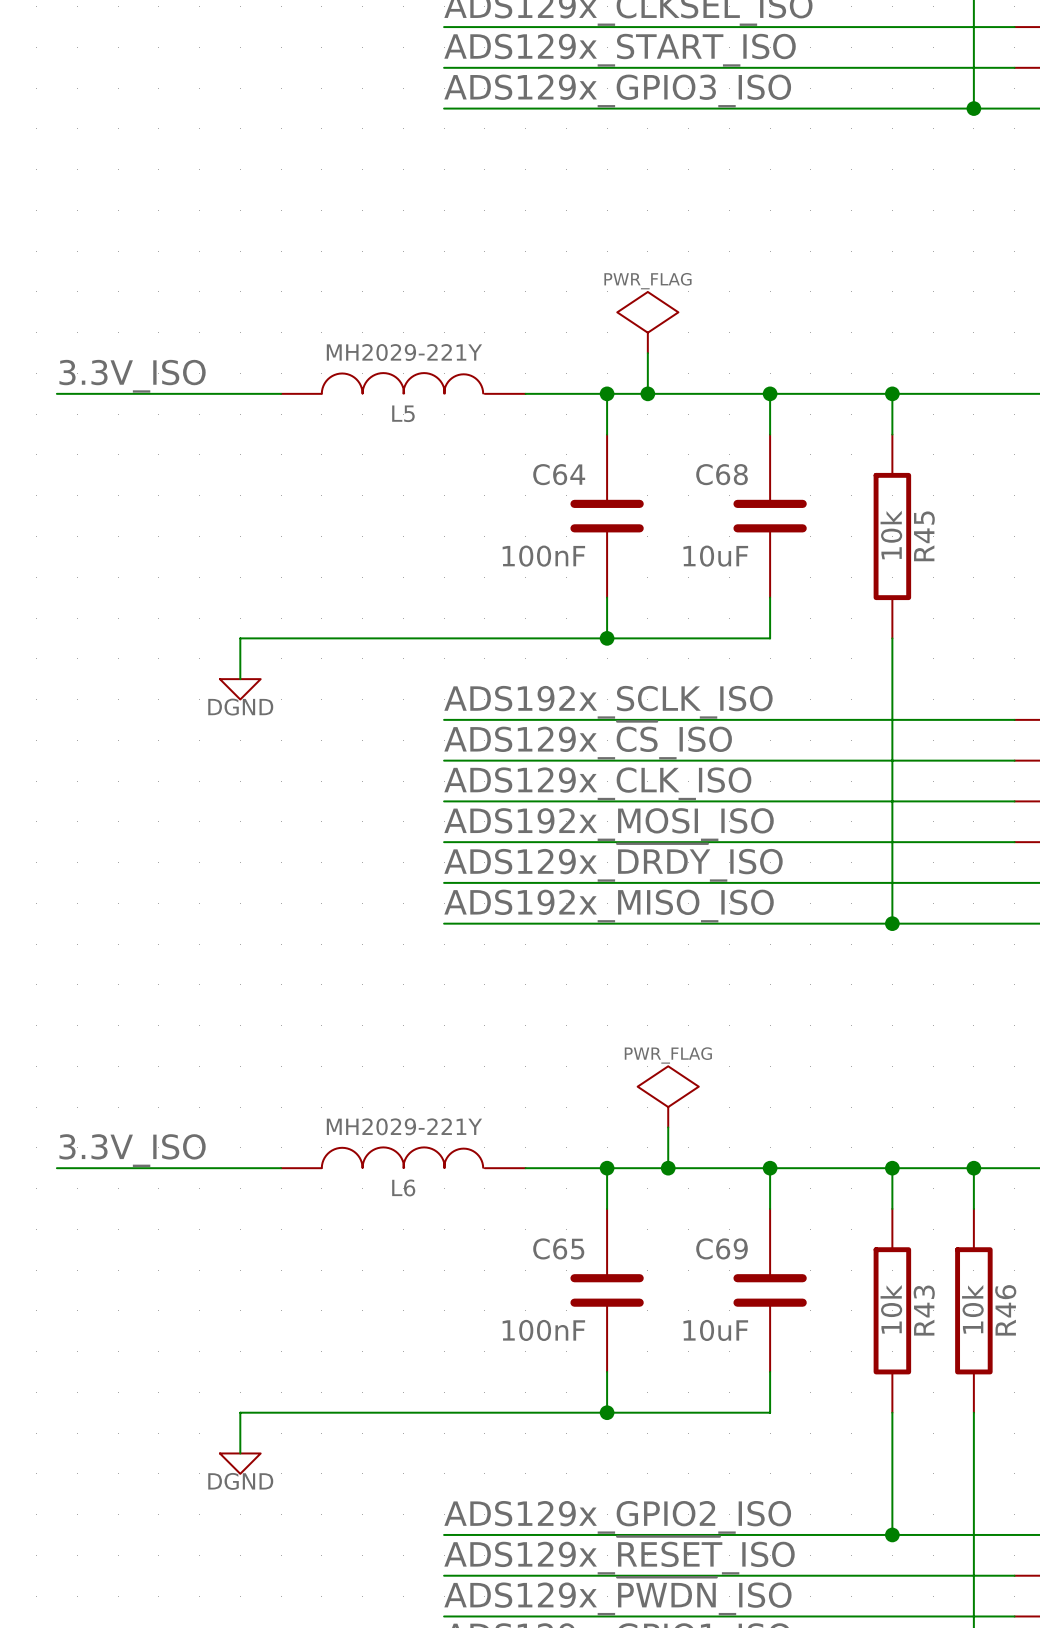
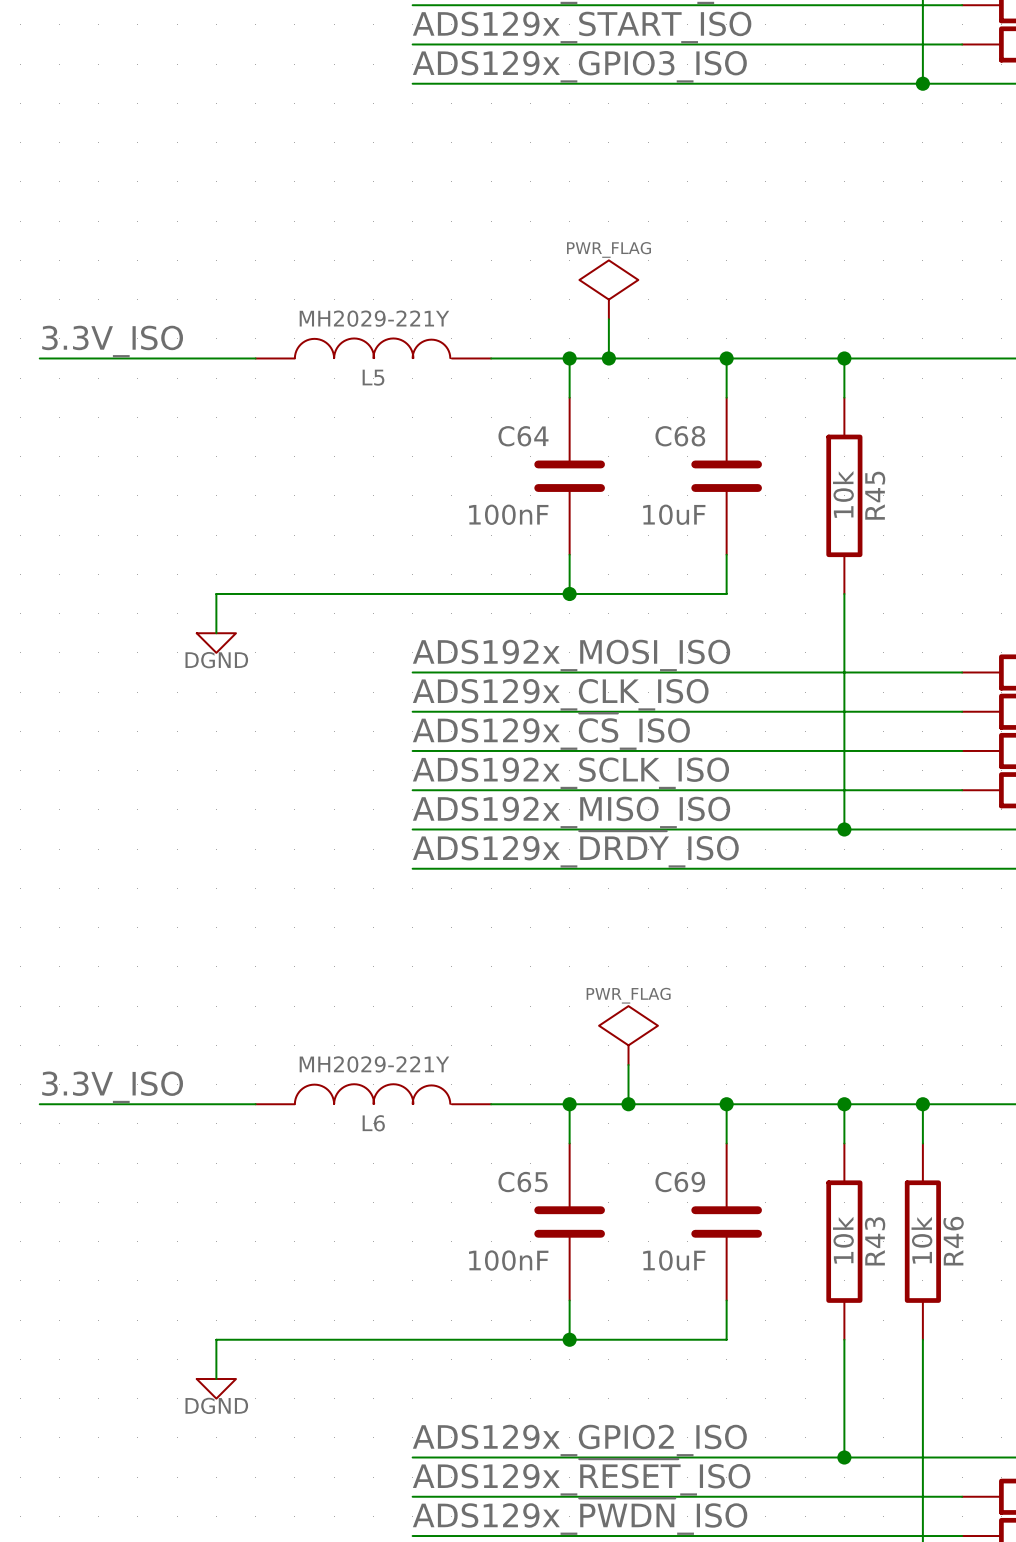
label: ADS192x_SCLK_ISO (608, 702) -> ADS192x_MOSI_ISO (571, 655)
label: ADS129x_~{CS}_ISO (588, 740) -> ADS129x_CLK_ISO (560, 694)
label: ADS129x_CLK_ISO (597, 783) -> ADS129x_~{CS}_ISO (551, 731)
label: ADS192x_MOSI_ISO (609, 824) -> ADS192x_SCLK_ISO (570, 773)
label: ADS129x_~{DRDY}_ISO (613, 862) -> ADS192x_MISO_ISO (571, 812)
wire: (892, 882) (892, 923) -> none
label: ADS192x_MISO_ISO (609, 906) -> ADS129x_~{DRDY}_ISO (575, 849)
junction position: (892, 923) -> (844, 829)

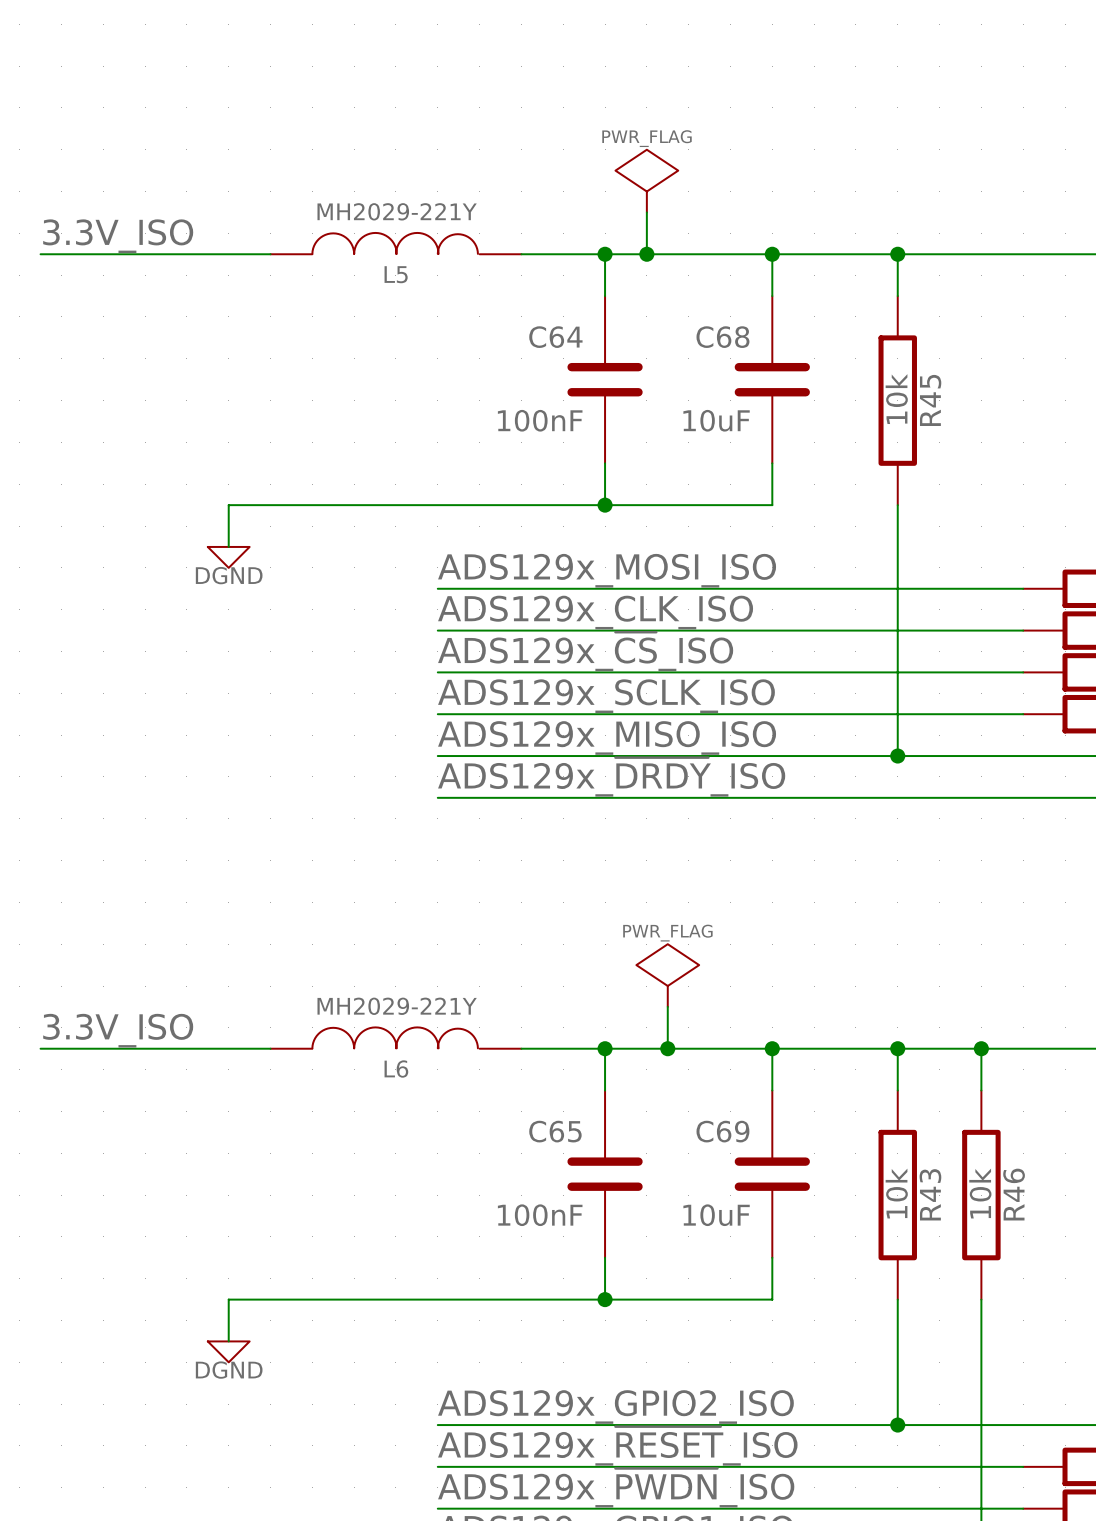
label: ADS192x_MOSI_ISO (571, 655) -> ADS129x_MOSI_ISO (607, 570)
label: ADS192x_SCLK_ISO (570, 773) -> ADS129x_SCLK_ISO (606, 696)
label: ADS192x_MISO_ISO (571, 812) -> ADS129x_MISO_ISO (607, 737)

